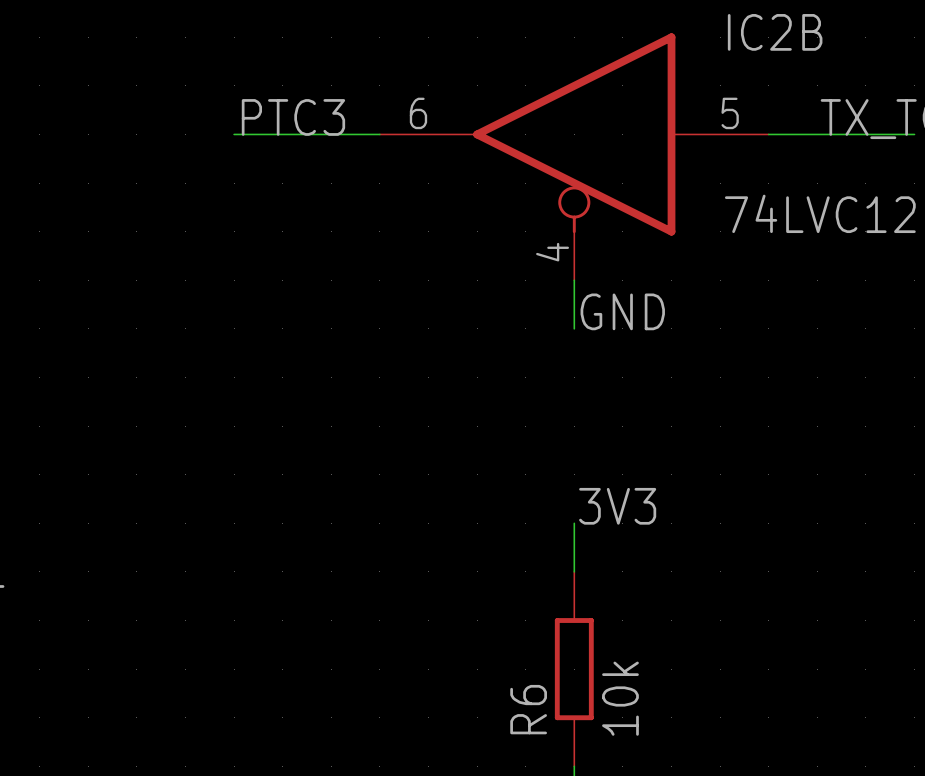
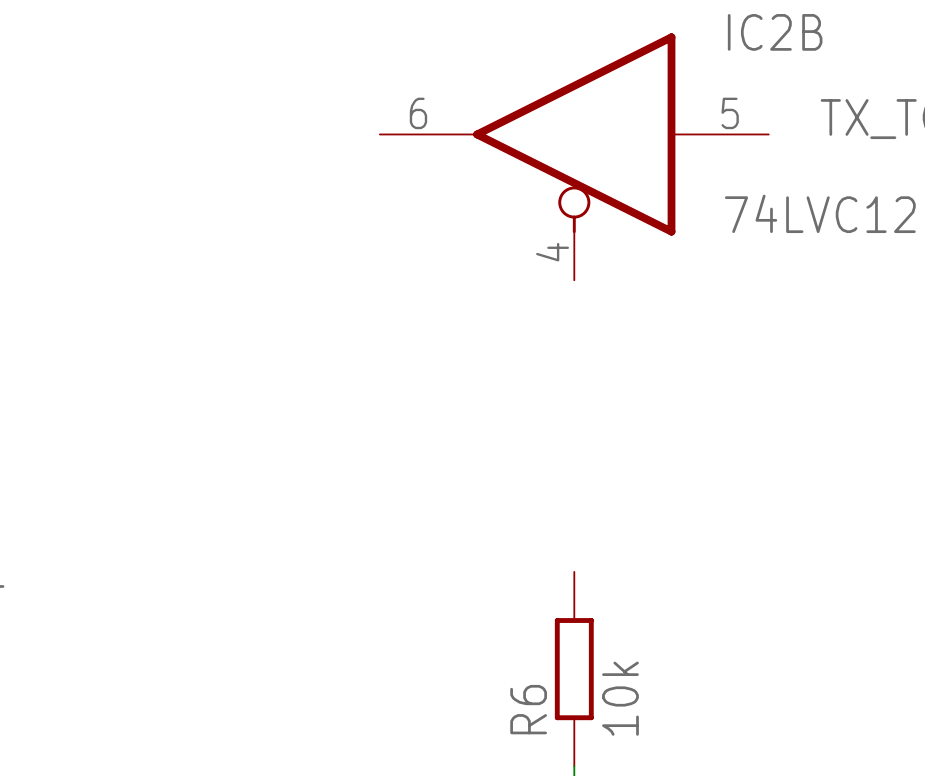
label: PTC3 (293, 117) -> none
wire: (234, 134) (379, 134) -> none
wire: (768, 134) (914, 134) -> none
wire: (574, 280) (574, 328) -> none
label: GND (622, 311) -> none
label: 3V3 (617, 506) -> none
wire: (574, 523) (574, 571) -> none

